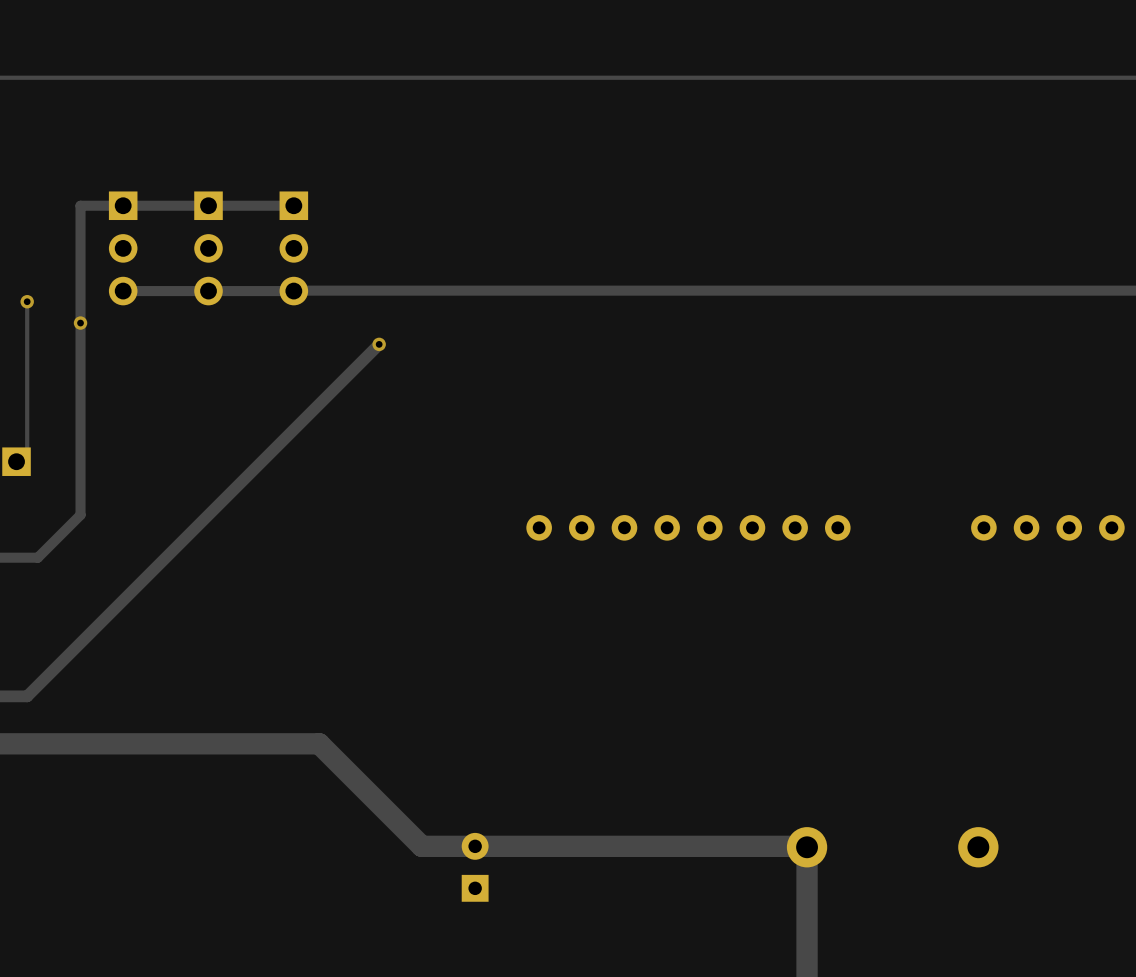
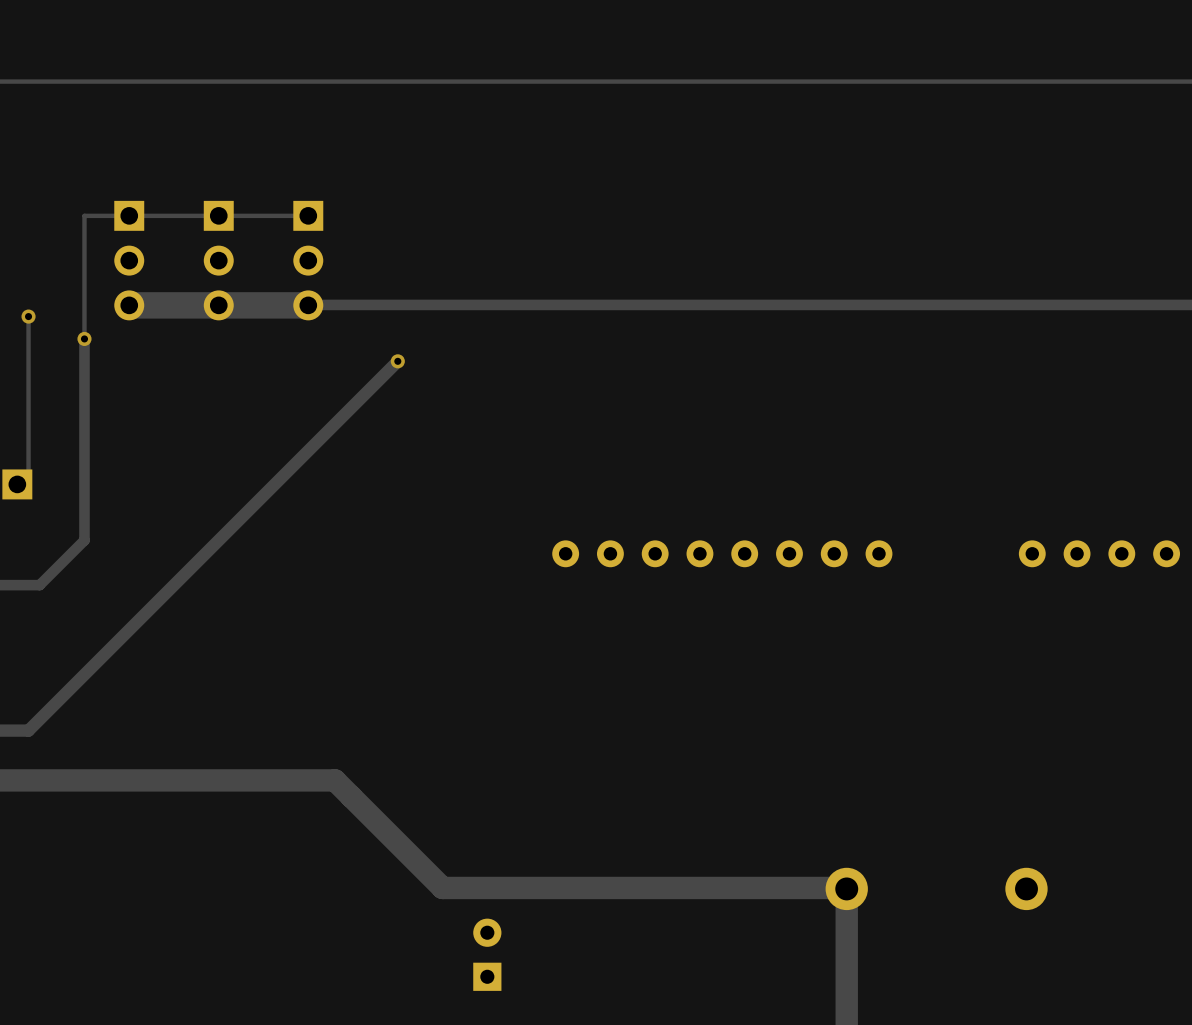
track width: thick (293, 205) (80, 205) (80, 323) -> thin (308, 215) (84, 215) (84, 338)
track width: thin (293, 291) (123, 291) -> thick (308, 305) (129, 305)
part position: (475, 867) -> (487, 954)

